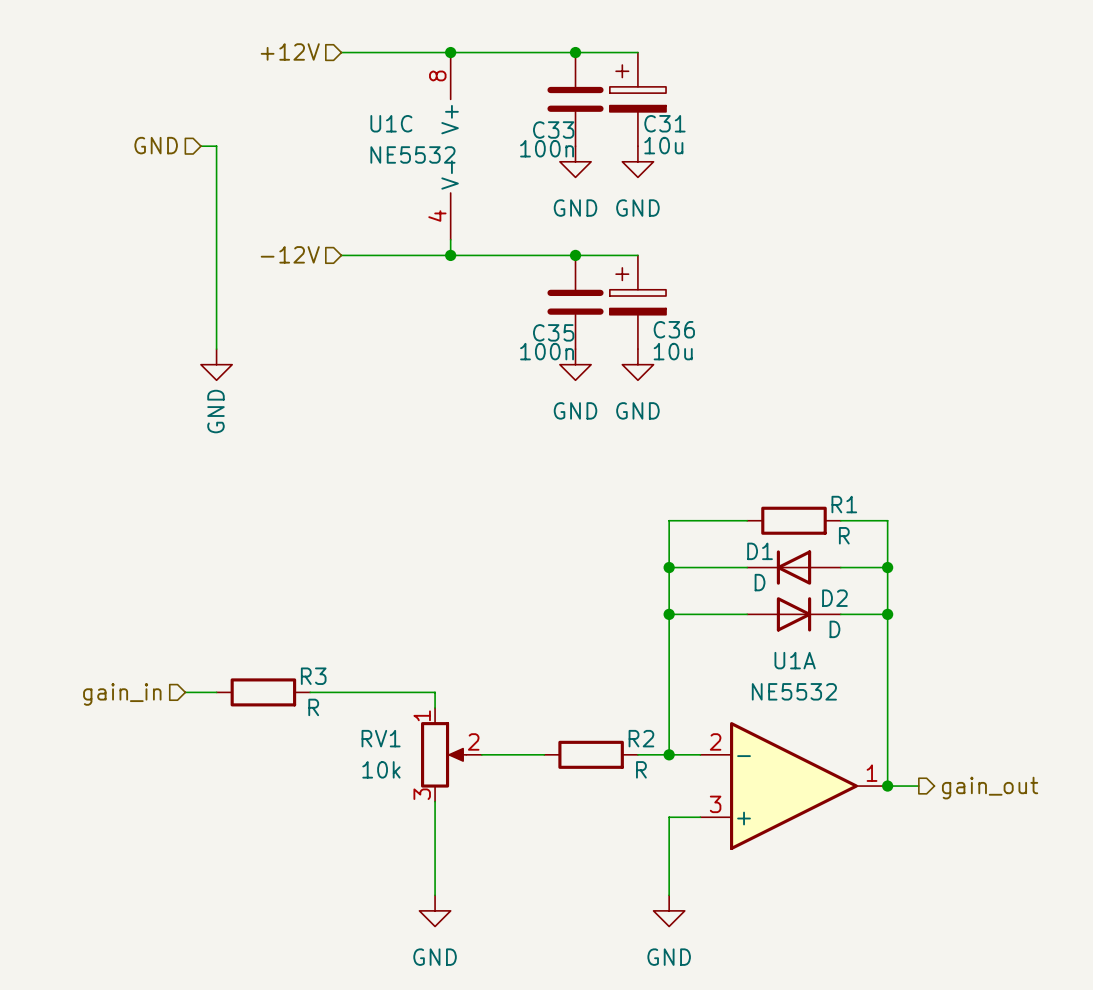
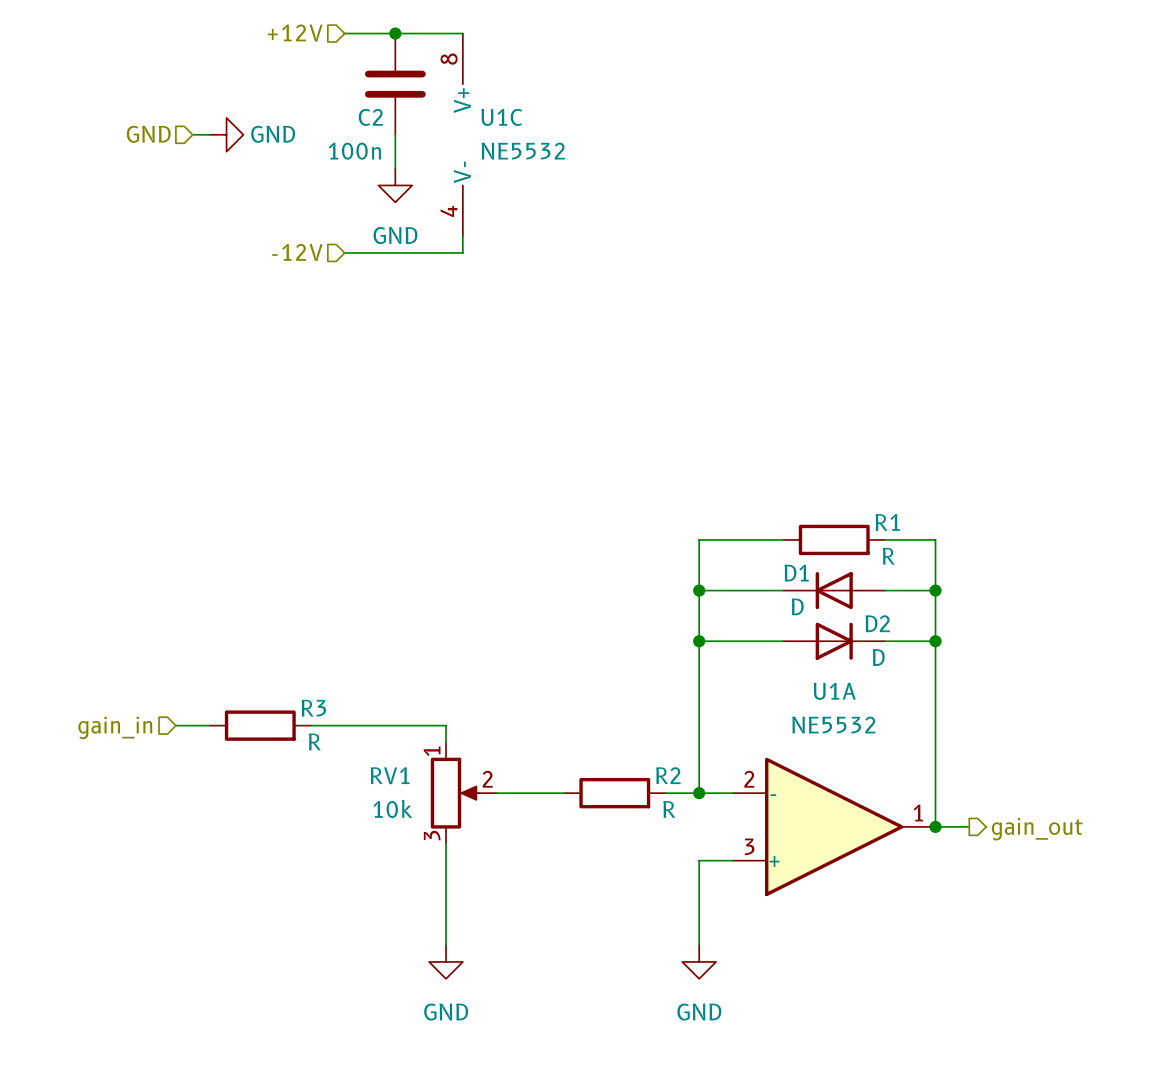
wire: (450, 52) (637, 52) -> none
junction position: (450, 52) -> (395, 33)
junction: (575, 52) -> none
C2: none -> 100n (395, 84)
C33: 100n (575, 99) -> none
C31: 10u (637, 99) -> none
U1C name position: U1C (391, 123) -> U1C (501, 117)
wire: (216, 146) (216, 349) -> none
power symbol: none -> GND (226, 134)
wire: none -> (395, 134) (395, 168)
U1C value position: NE5532 (412, 154) -> NE5532 (523, 151)
power symbol: GND (575, 161) -> none
power symbol: GND (637, 161) -> none
power symbol: none -> GND (395, 185)
wire: (450, 255) (637, 255) -> none
junction: (450, 255) -> none
junction: (575, 255) -> none
C35: 100n (575, 302) -> none
C36: 10u (637, 302) -> none
power symbol: GND (216, 364) -> none
power symbol: GND (575, 364) -> none
power symbol: GND (637, 364) -> none

